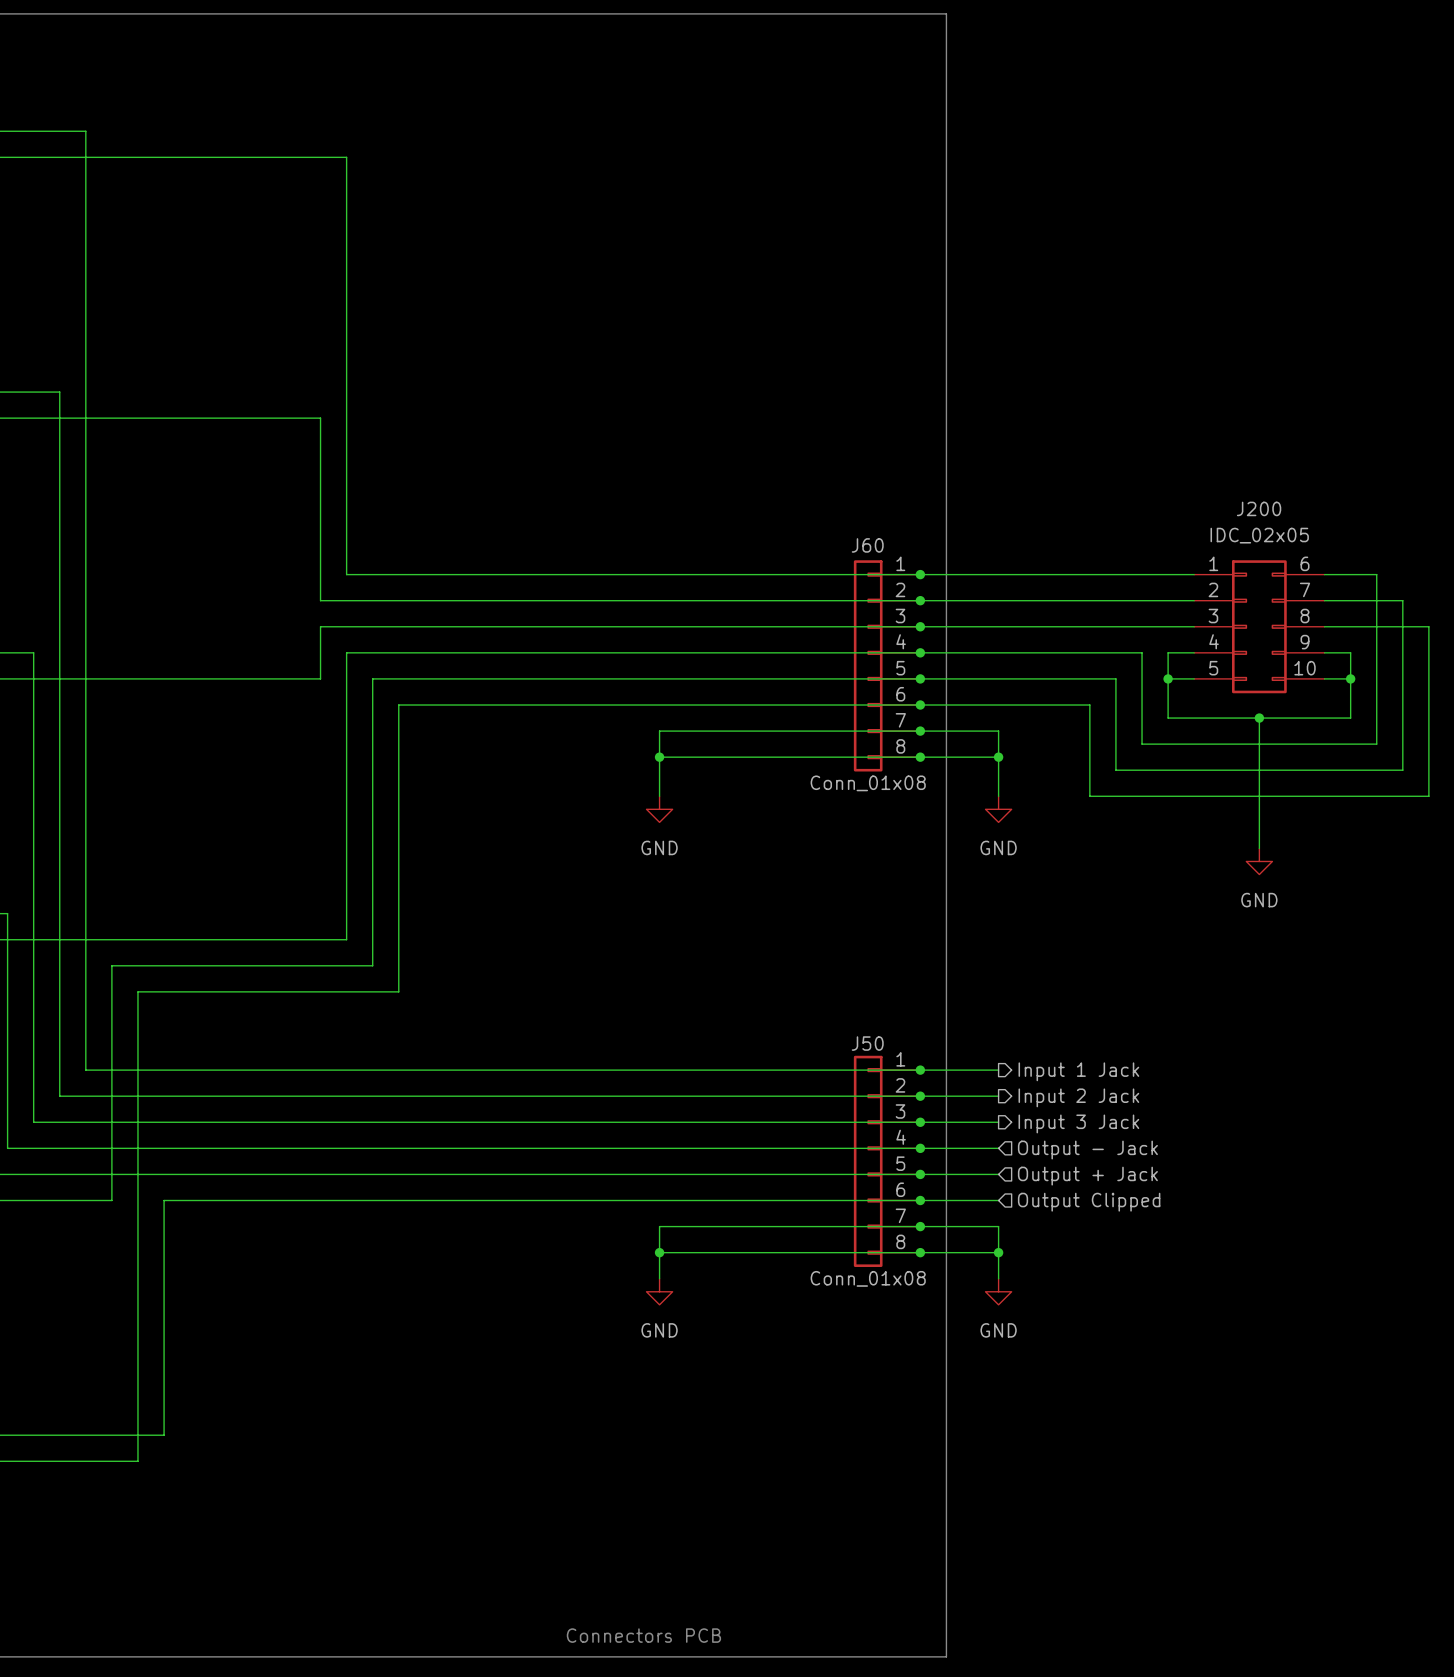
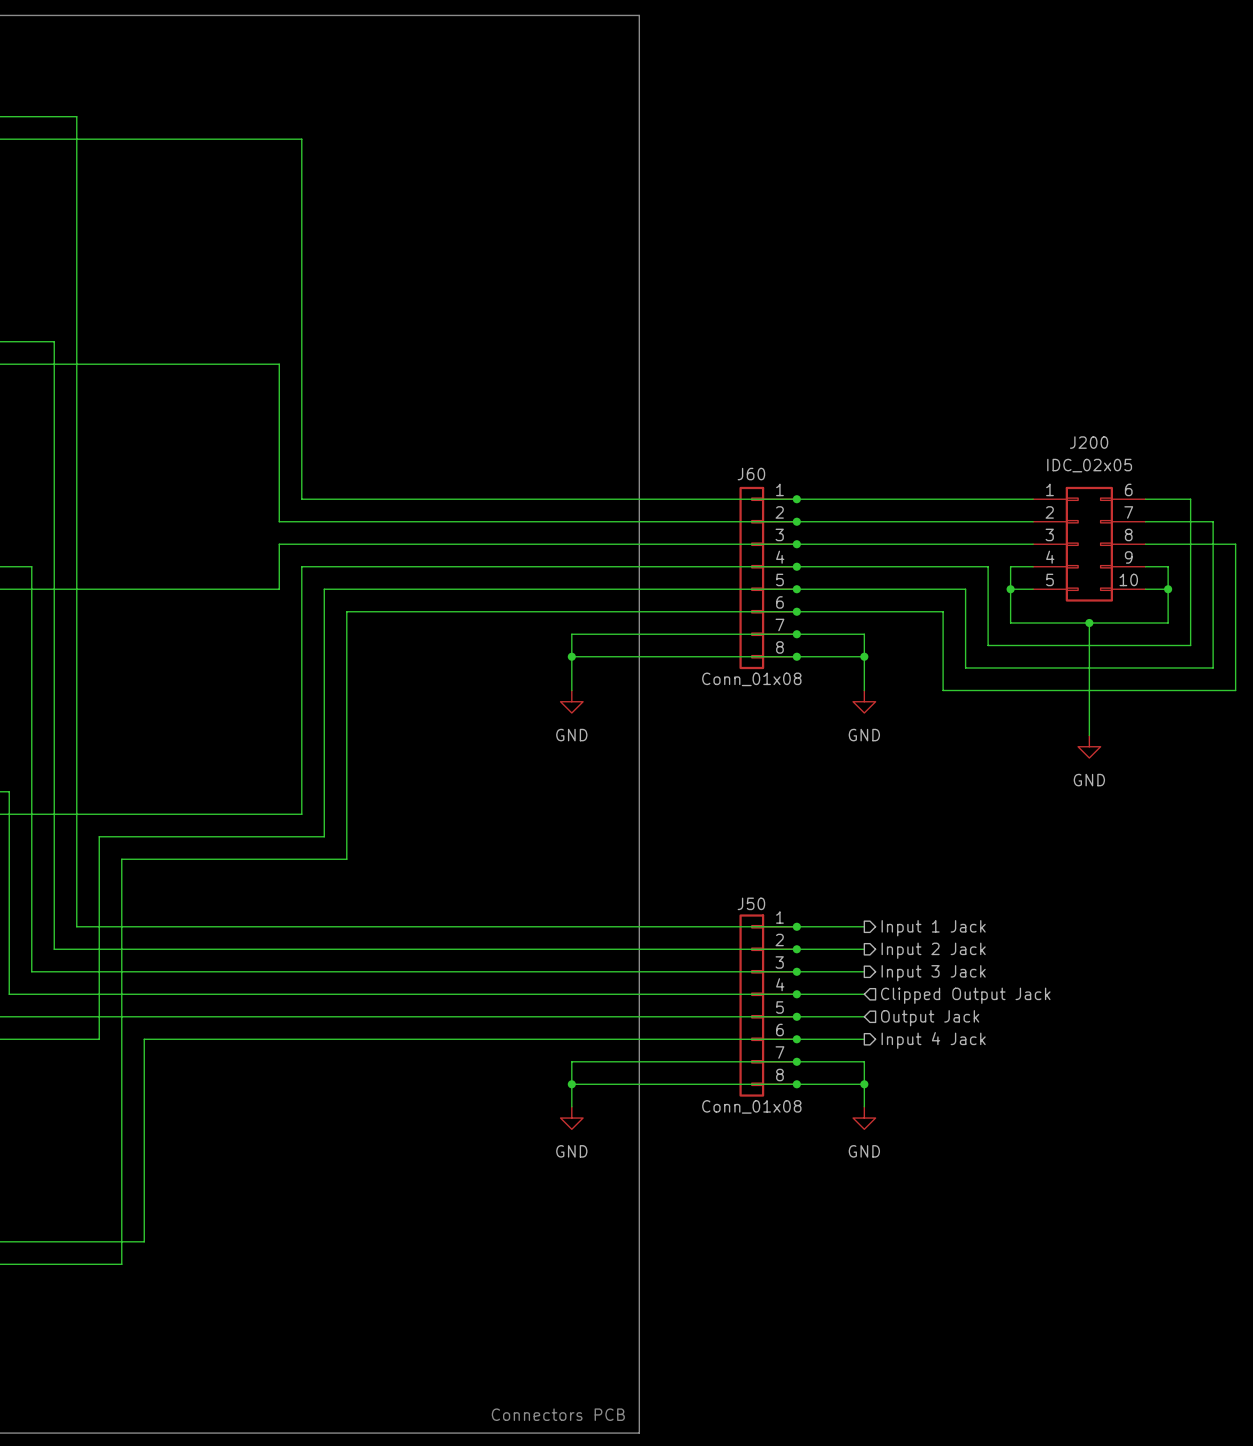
line: (737, 13) (946, 13) (946, 1656) (737, 1656) -> (639, 15) (639, 1433)
hierarchical label: Output - Jack (1087, 1150) -> Clipped Output Jack (965, 995)
hierarchical label: Output + Jack (1087, 1176) -> Output Jack (930, 1018)
hierarchical label shape: input (1089, 1202) -> output (933, 1040)
hierarchical label: Output Clipped (1089, 1202) -> Input 4 Jack (933, 1040)

